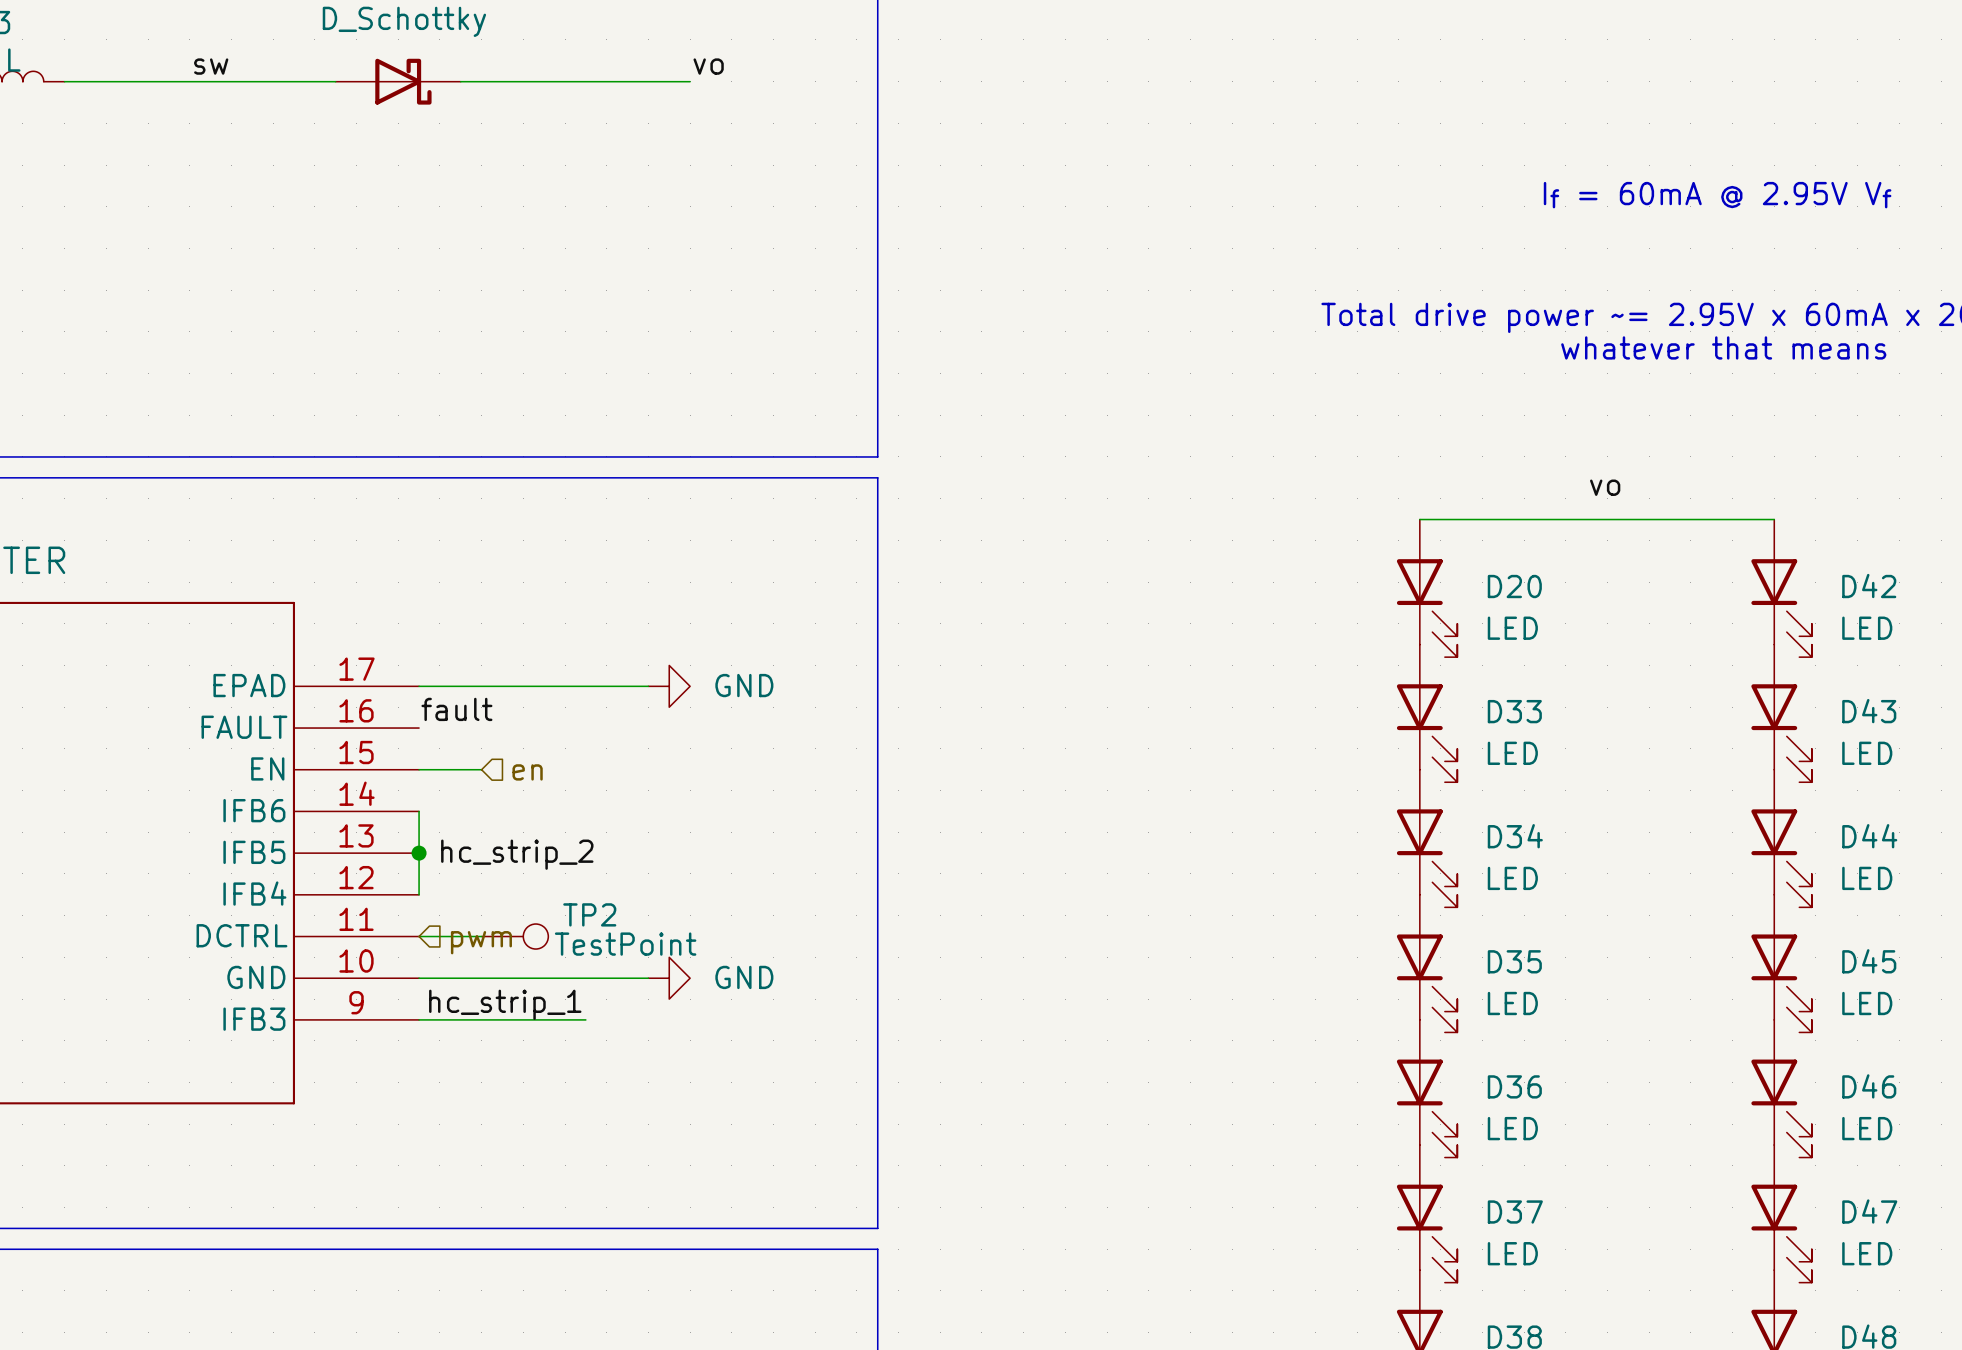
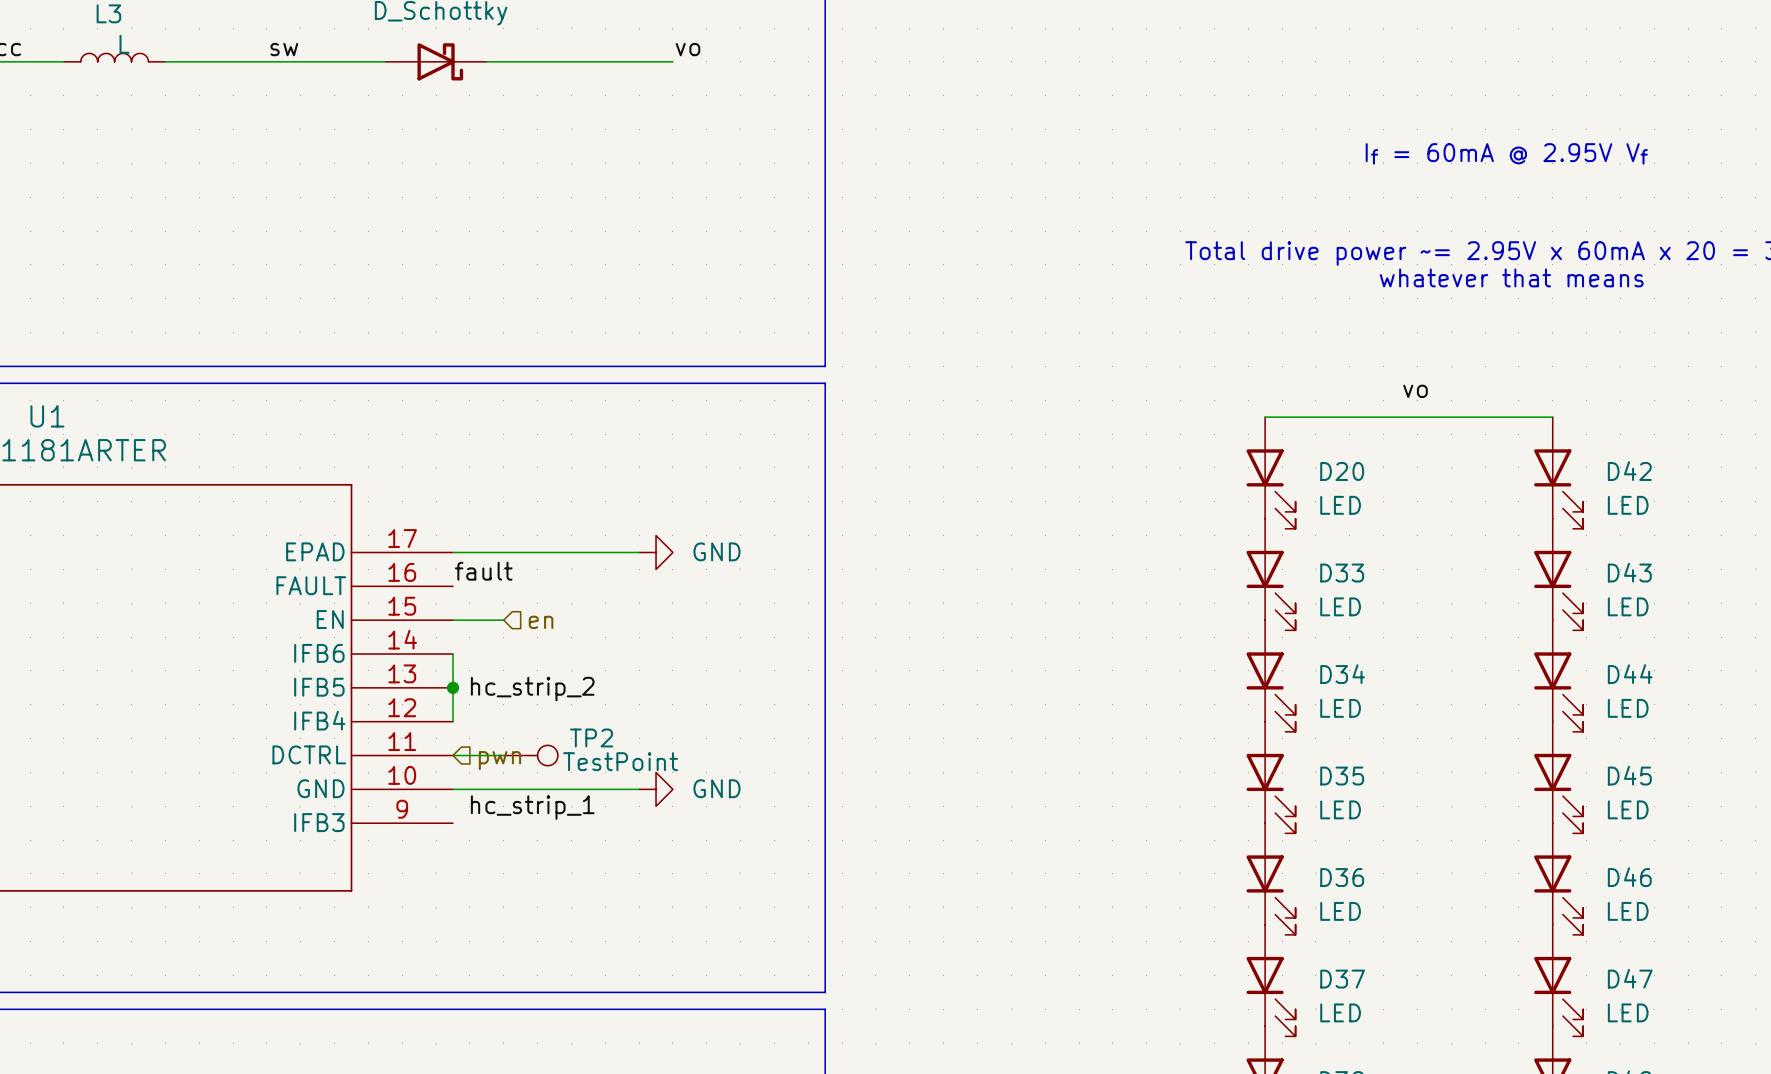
hierarchical label: pwm (481, 942) -> pwn (499, 760)
label position: hc_strip_1 (505, 1004) -> hc_strip_1 (532, 807)
wire: (419, 1019) (585, 1019) -> none

